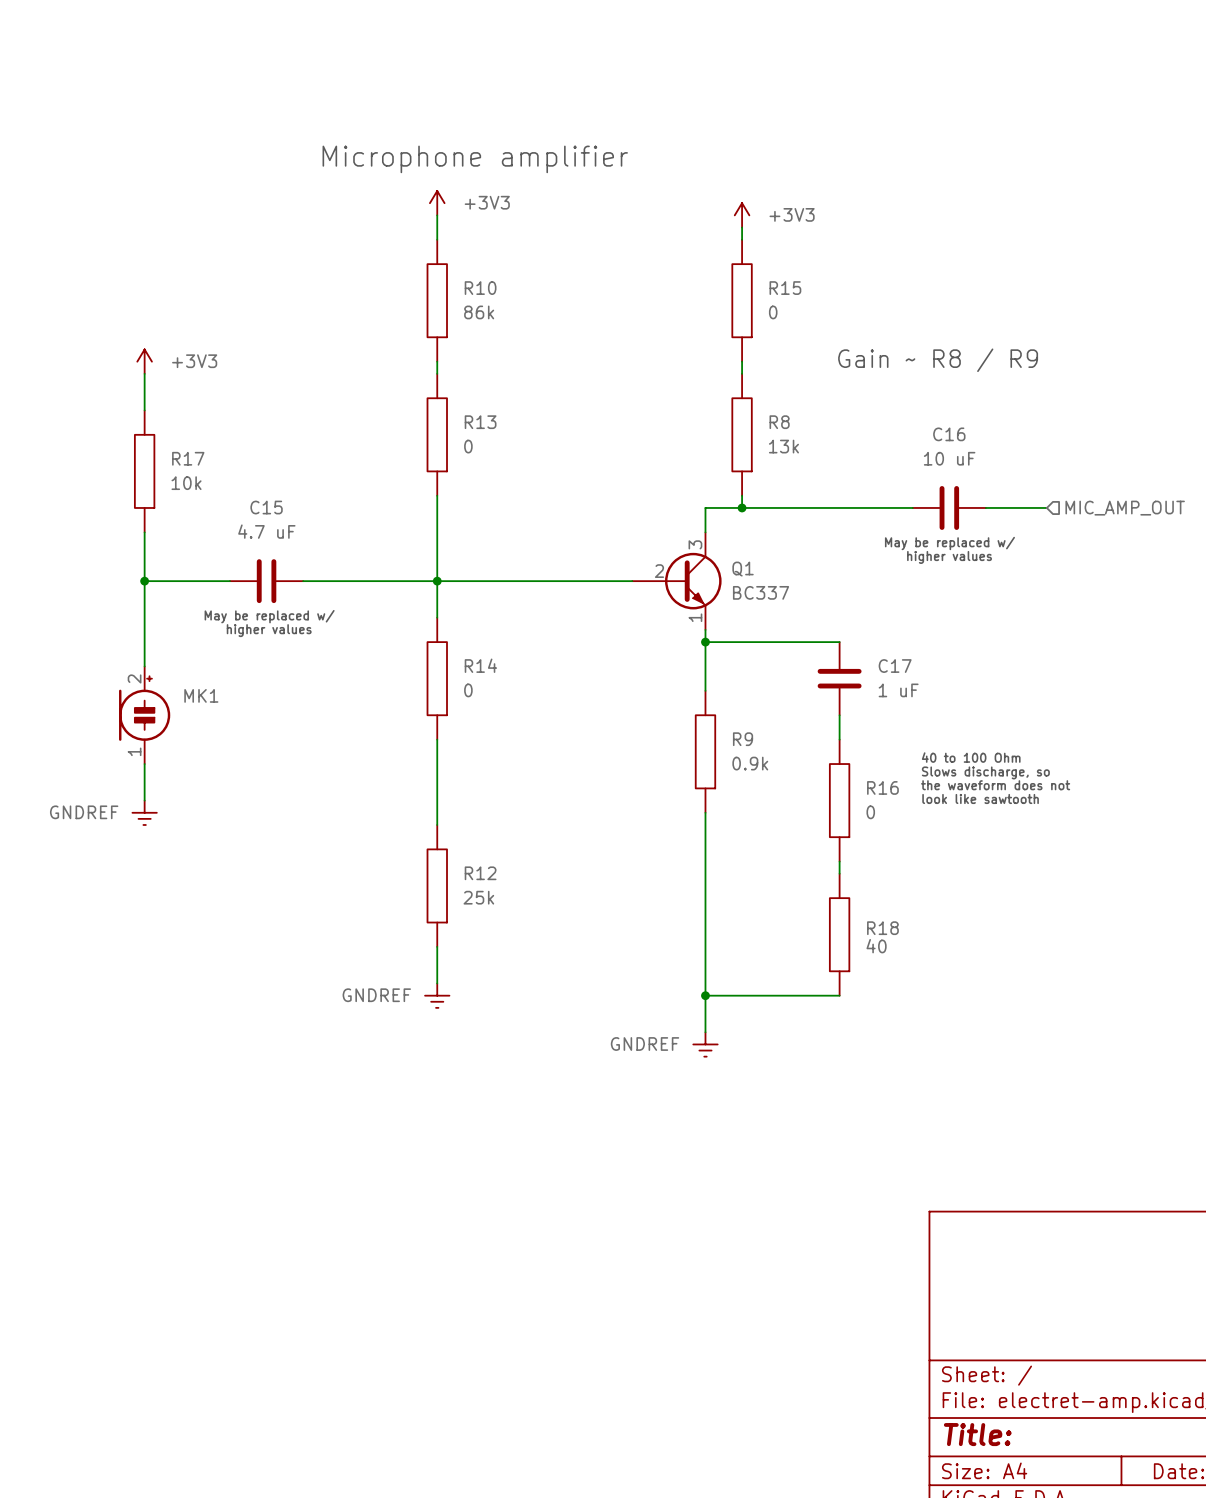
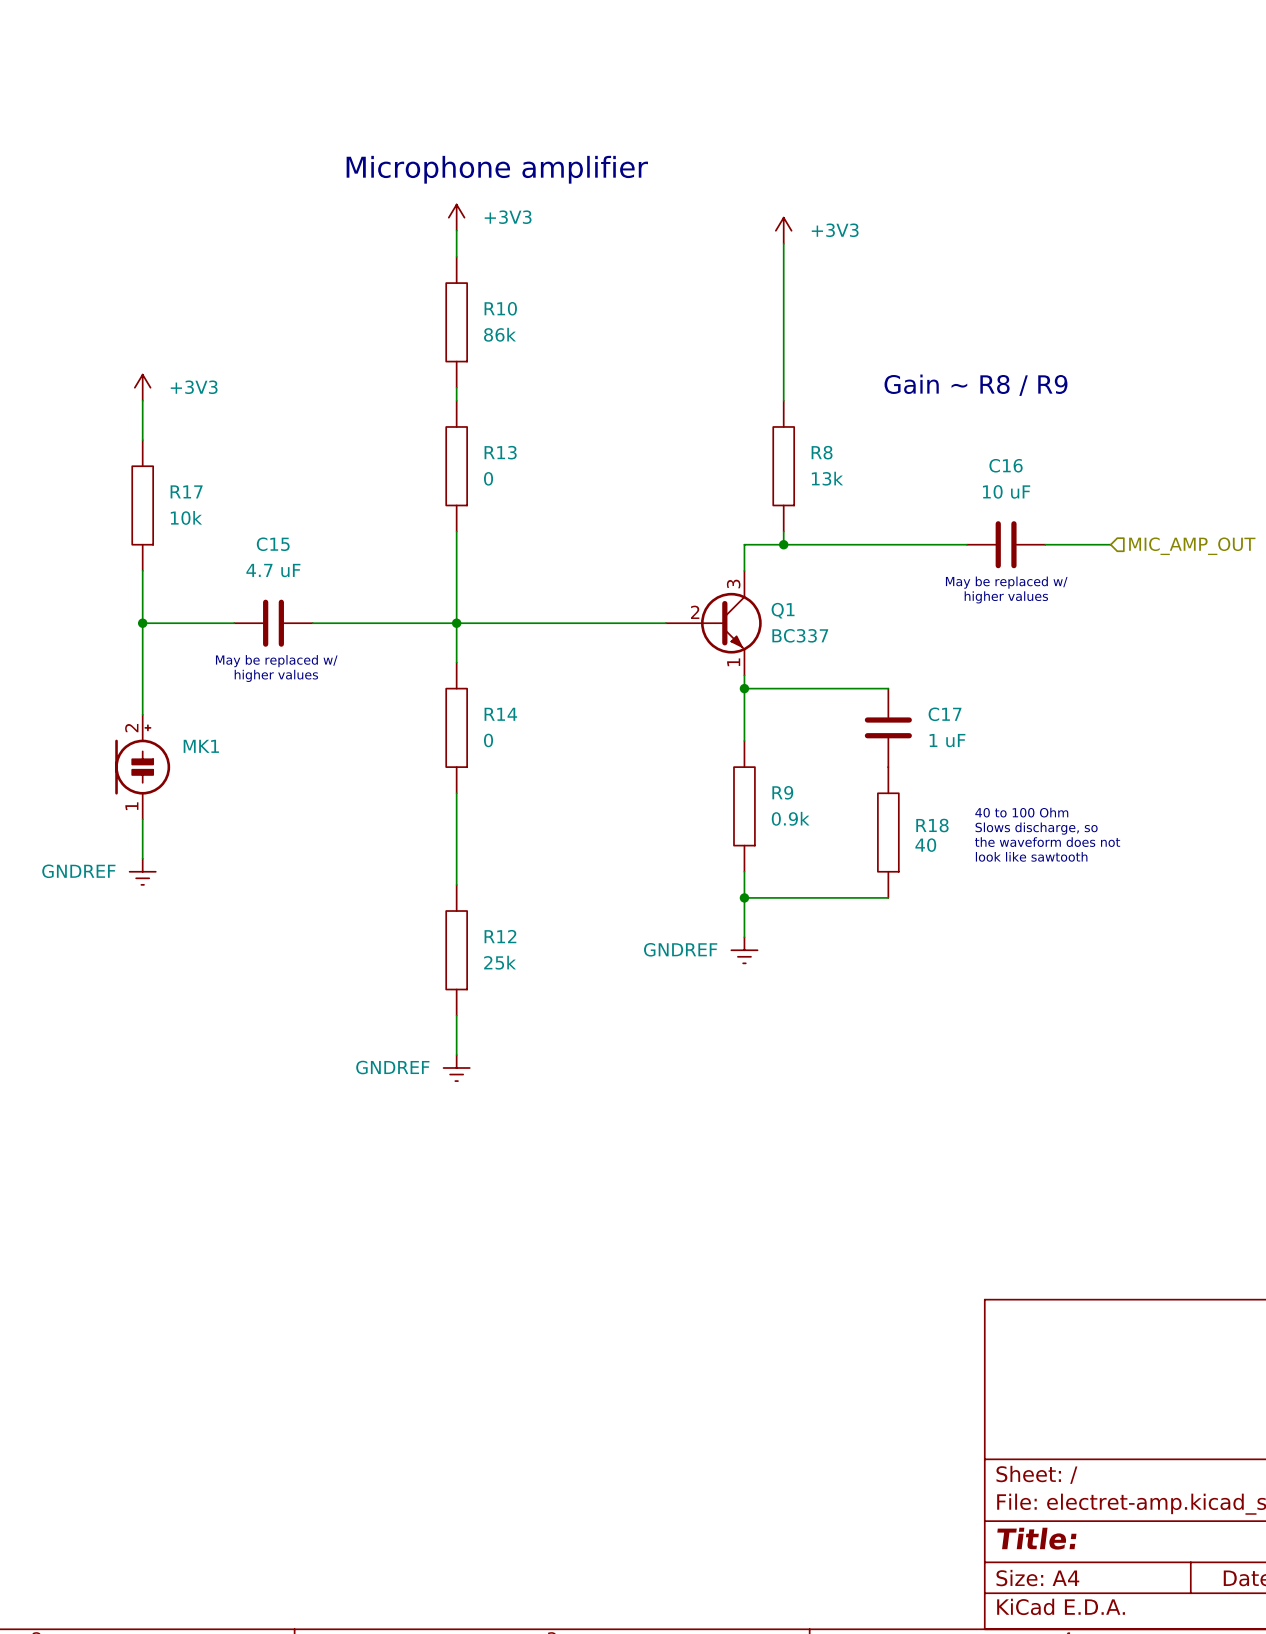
wire: none -> (783, 256) (783, 387)
R15: 0 (742, 300) -> none
R16: 0 (839, 800) -> none
junction: none -> (744, 897)
wire: (839, 861) (839, 873) -> none
wire: (705, 873) (705, 1032) -> none
R18 position: (839, 934) -> (888, 832)
wire: (705, 995) (839, 995) -> (744, 897) (888, 897)
junction: (705, 995) -> none
power symbol position: GNDREF (705, 1044) -> GNDREF (744, 950)

